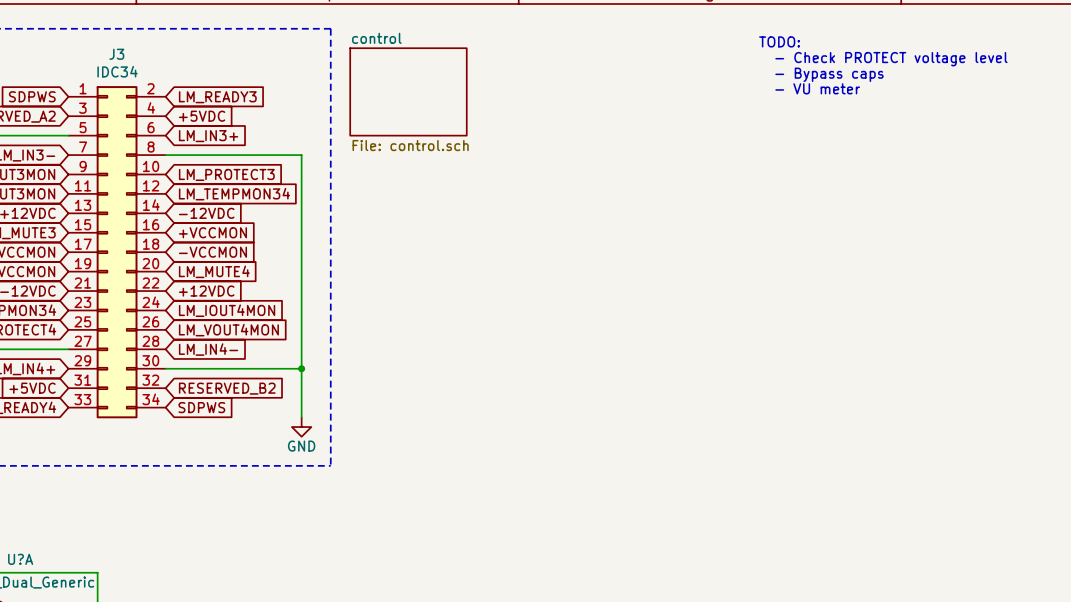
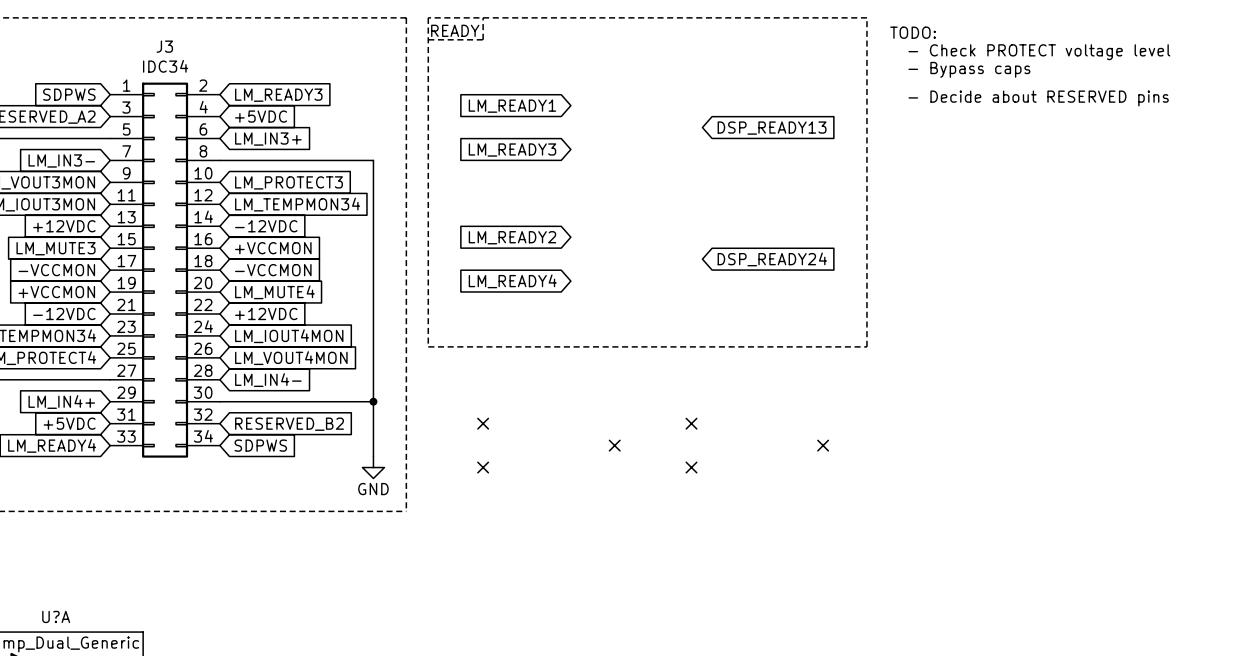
line: none -> (428, 17) (428, 346) (866, 346) (866, 17) (428, 17)
line: none -> (483, 17) (483, 39) (428, 39)
text: none -> READY (455, 30)
text: - VU meter (817, 88) -> none
sheet control: File: control.sch (408, 91) -> none
text: none -> - Decide about RESERVED pins (1038, 98)
global label: none -> LM_READY1 (512, 106)
global label: none -> DSP_READY13 (772, 128)
global label: none -> LM_READY3 (512, 150)
global label: none -> LM_READY2 (512, 237)
global label: none -> DSP_READY24 (772, 259)
global label: none -> LM_READY4 (512, 281)
no-connect mark: none -> (483, 423)
no-connect mark: none -> (691, 423)
no-connect mark: none -> (614, 445)
no-connect mark: none -> (823, 445)
no-connect mark: none -> (483, 467)
no-connect mark: none -> (691, 467)

